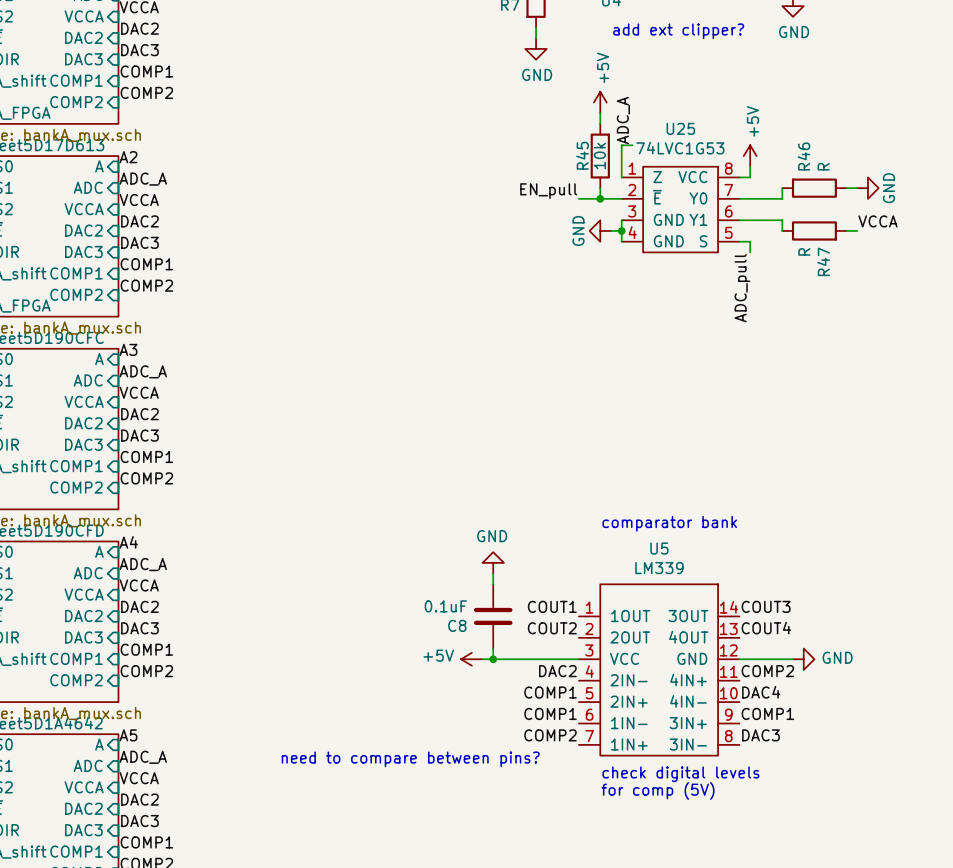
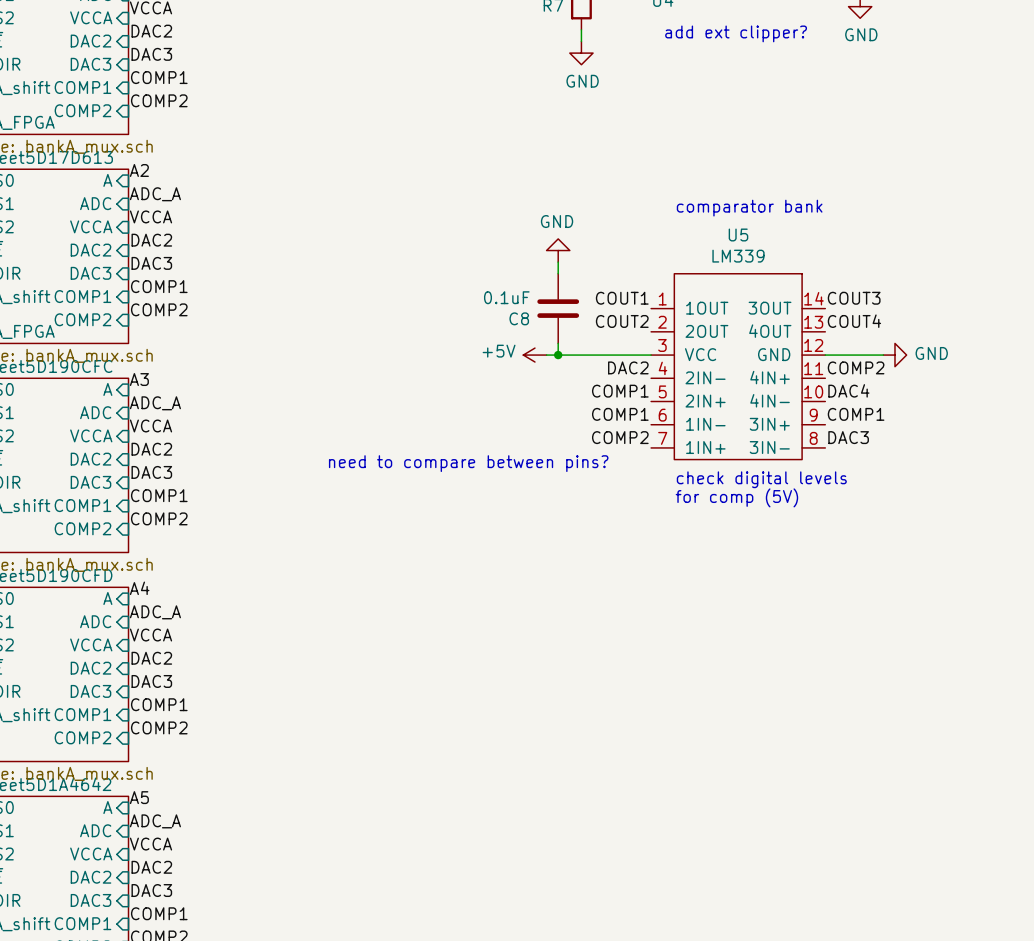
power symbol: +5V (600, 102) -> none
wire: (600, 113) (600, 123) -> (558, 262) (558, 273)
label: ADC_A (623, 120) -> none
wire: (632, 145) (621, 145) (621, 177) -> none
R45: 10k (600, 156) -> none
power symbol: +5V (750, 156) -> none
wire: (750, 166) (750, 177) (739, 177) -> none
wire: (600, 188) (600, 198) -> (558, 343) (558, 355)
wire: (782, 188) (782, 198) (739, 198) -> none
R46: R (814, 188) -> none
wire: (846, 188) (857, 188) -> none
power symbol: GND (867, 188) -> none
label: EN_pull (548, 191) -> none
text: none -> comparator bank (749, 208)
wire: (578, 198) (621, 198) -> none
junction: (600, 198) -> none
U25: 74LVC1G53 (680, 209) -> none
wire: (621, 220) (621, 241) -> none
wire: (739, 220) (782, 220) (782, 230) -> none
label: VCCA (877, 221) -> none
power symbol rotation: 0° (600, 230) -> 90° clockwise (558, 250)
power symbol position: GND (600, 230) -> GND (558, 250)
wire: (611, 230) (621, 230) -> none
junction: (621, 230) -> none
R47: R (814, 230) -> none
wire: (846, 230) (857, 230) -> none
wire: (739, 241) (750, 241) (750, 252) -> none
label: none -> COUT1 (622, 298)
label: none -> COUT3 (854, 298)
label: ADC_pull (742, 288) -> none
label: none -> COUT2 (622, 321)
label: none -> COUT4 (854, 321)
power symbol: none -> +5V (534, 355)
wire: none -> (546, 355) (651, 355)
junction: none -> (558, 355)
wire: none -> (825, 355) (883, 355)
power symbol: none -> GND (894, 355)
label: none -> DAC2 (628, 367)
label: none -> COMP2 (856, 367)
label: none -> COMP1 (620, 391)
label: none -> DAC4 (848, 390)
label: none -> COMP1 (620, 414)
label: none -> COMP1 (856, 414)
label: none -> COMP2 (620, 437)
label: none -> DAC3 (848, 437)
text: none -> need to compare between pins? (468, 463)
text: none -> check digital levels (761, 479)
text: none -> for comp (5V) (736, 497)
text: comparator bank (669, 523) -> none
power symbol: GND (493, 562) -> none
wire: (493, 573) (493, 584) -> none
label: COUT1 (552, 606) -> none
label: COUT3 (766, 606) -> none
C8 position: (493, 616) -> (558, 308)
label: COUT2 (552, 628) -> none
label: COUT4 (766, 628) -> none
wire: (493, 648) (493, 659) -> none
power symbol: +5V (471, 659) -> none
wire: (482, 659) (578, 659) -> none
junction: (493, 659) -> none
wire: (739, 659) (793, 659) -> none
power symbol: GND (803, 659) -> none
U5 position: (659, 669) -> (738, 366)
label: DAC2 (557, 671) -> none
label: COMP2 (767, 671) -> none
label: COMP1 (550, 692) -> none
label: DAC4 (761, 692) -> none
label: COMP1 (550, 713) -> none
label: COMP1 (767, 713) -> none
label: COMP2 (550, 735) -> none
label: DAC3 (760, 735) -> none
text: need to compare between pins? (410, 759) -> none
text: check digital levels (680, 774) -> none
text: for comp (5V) (657, 790) -> none

